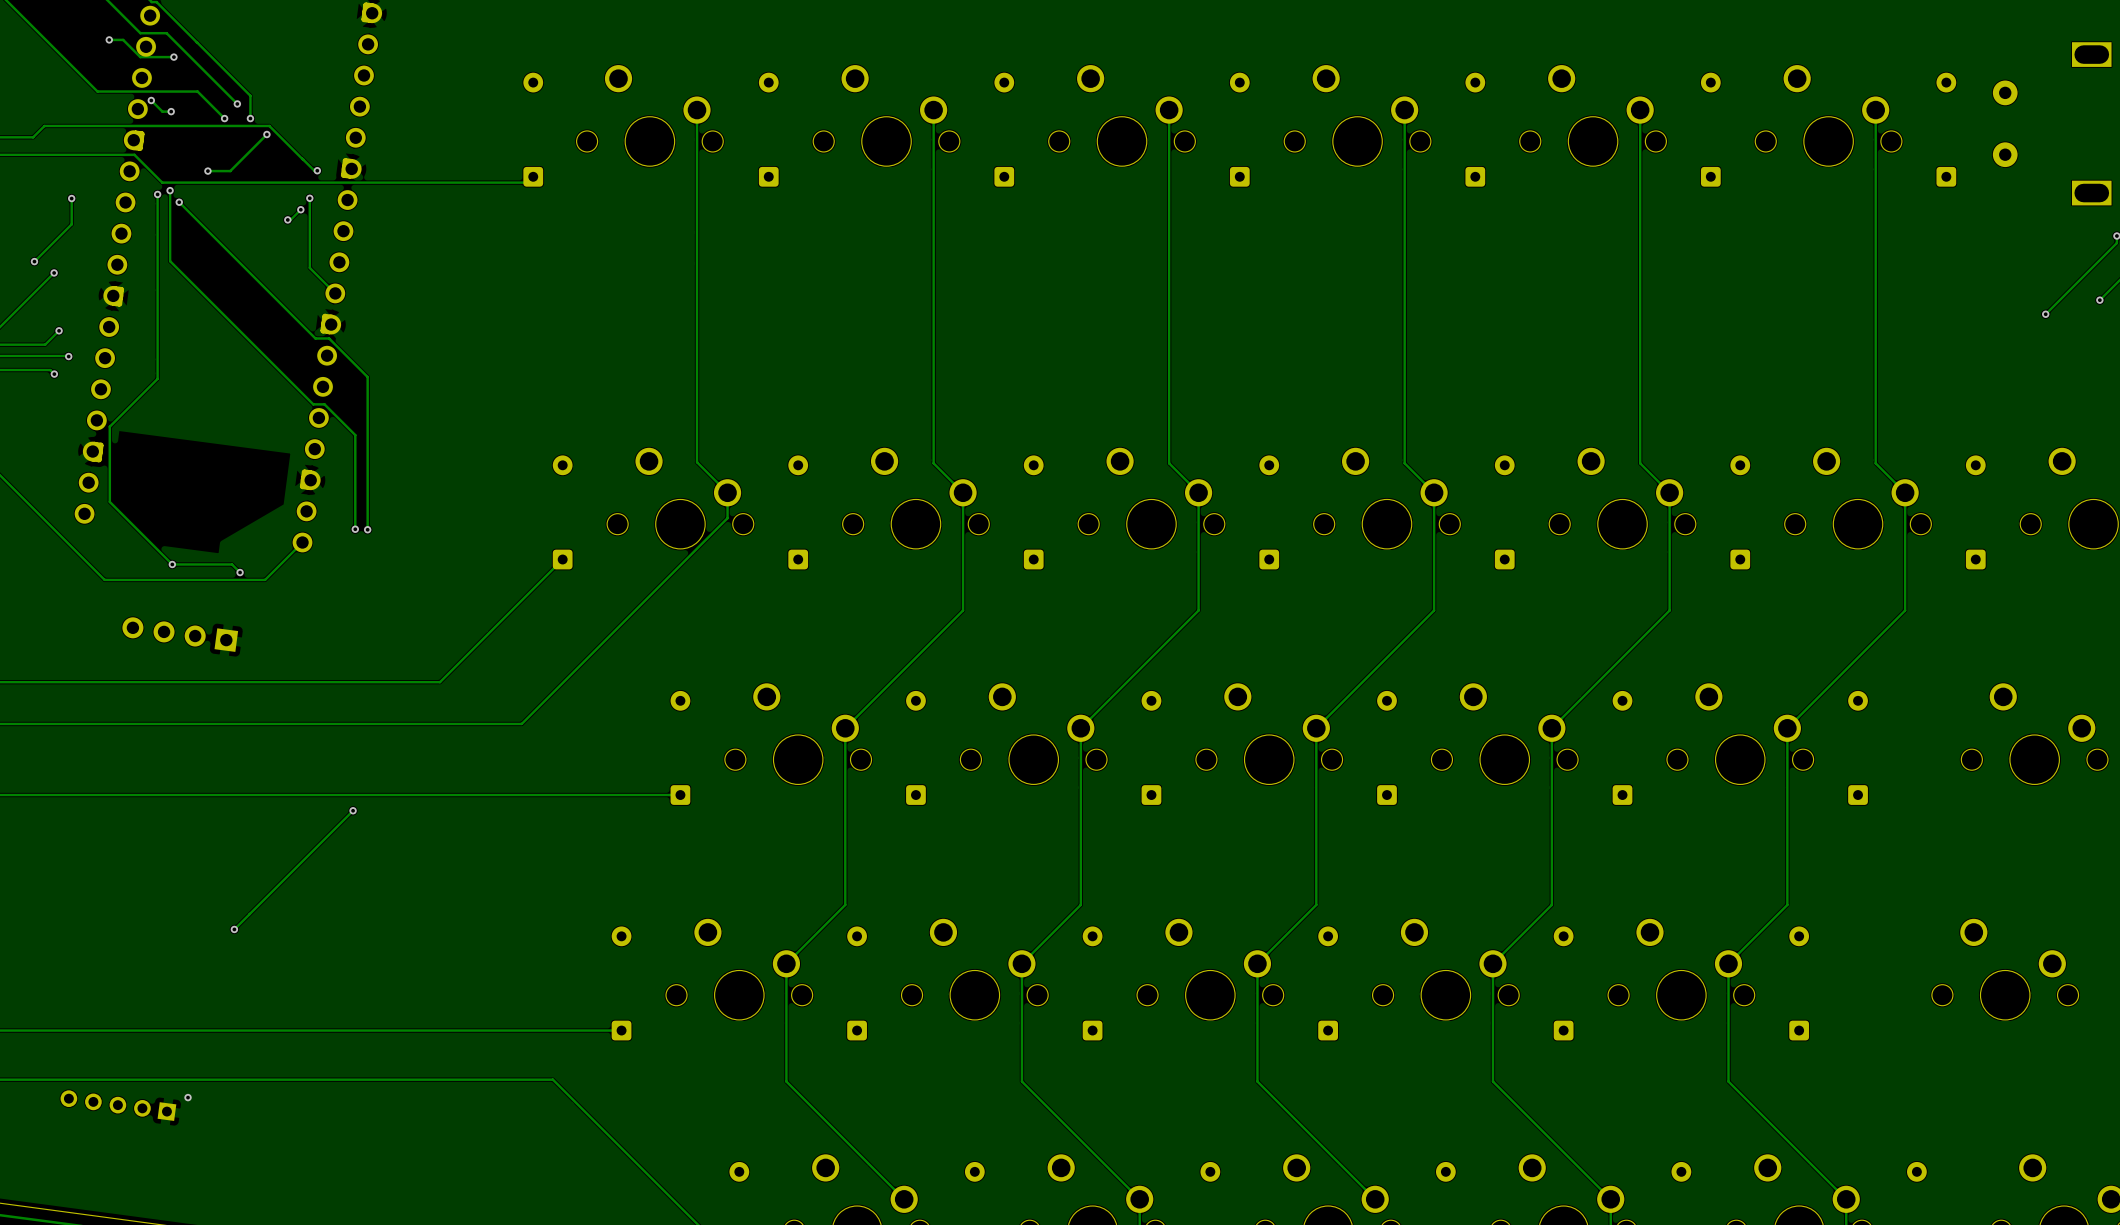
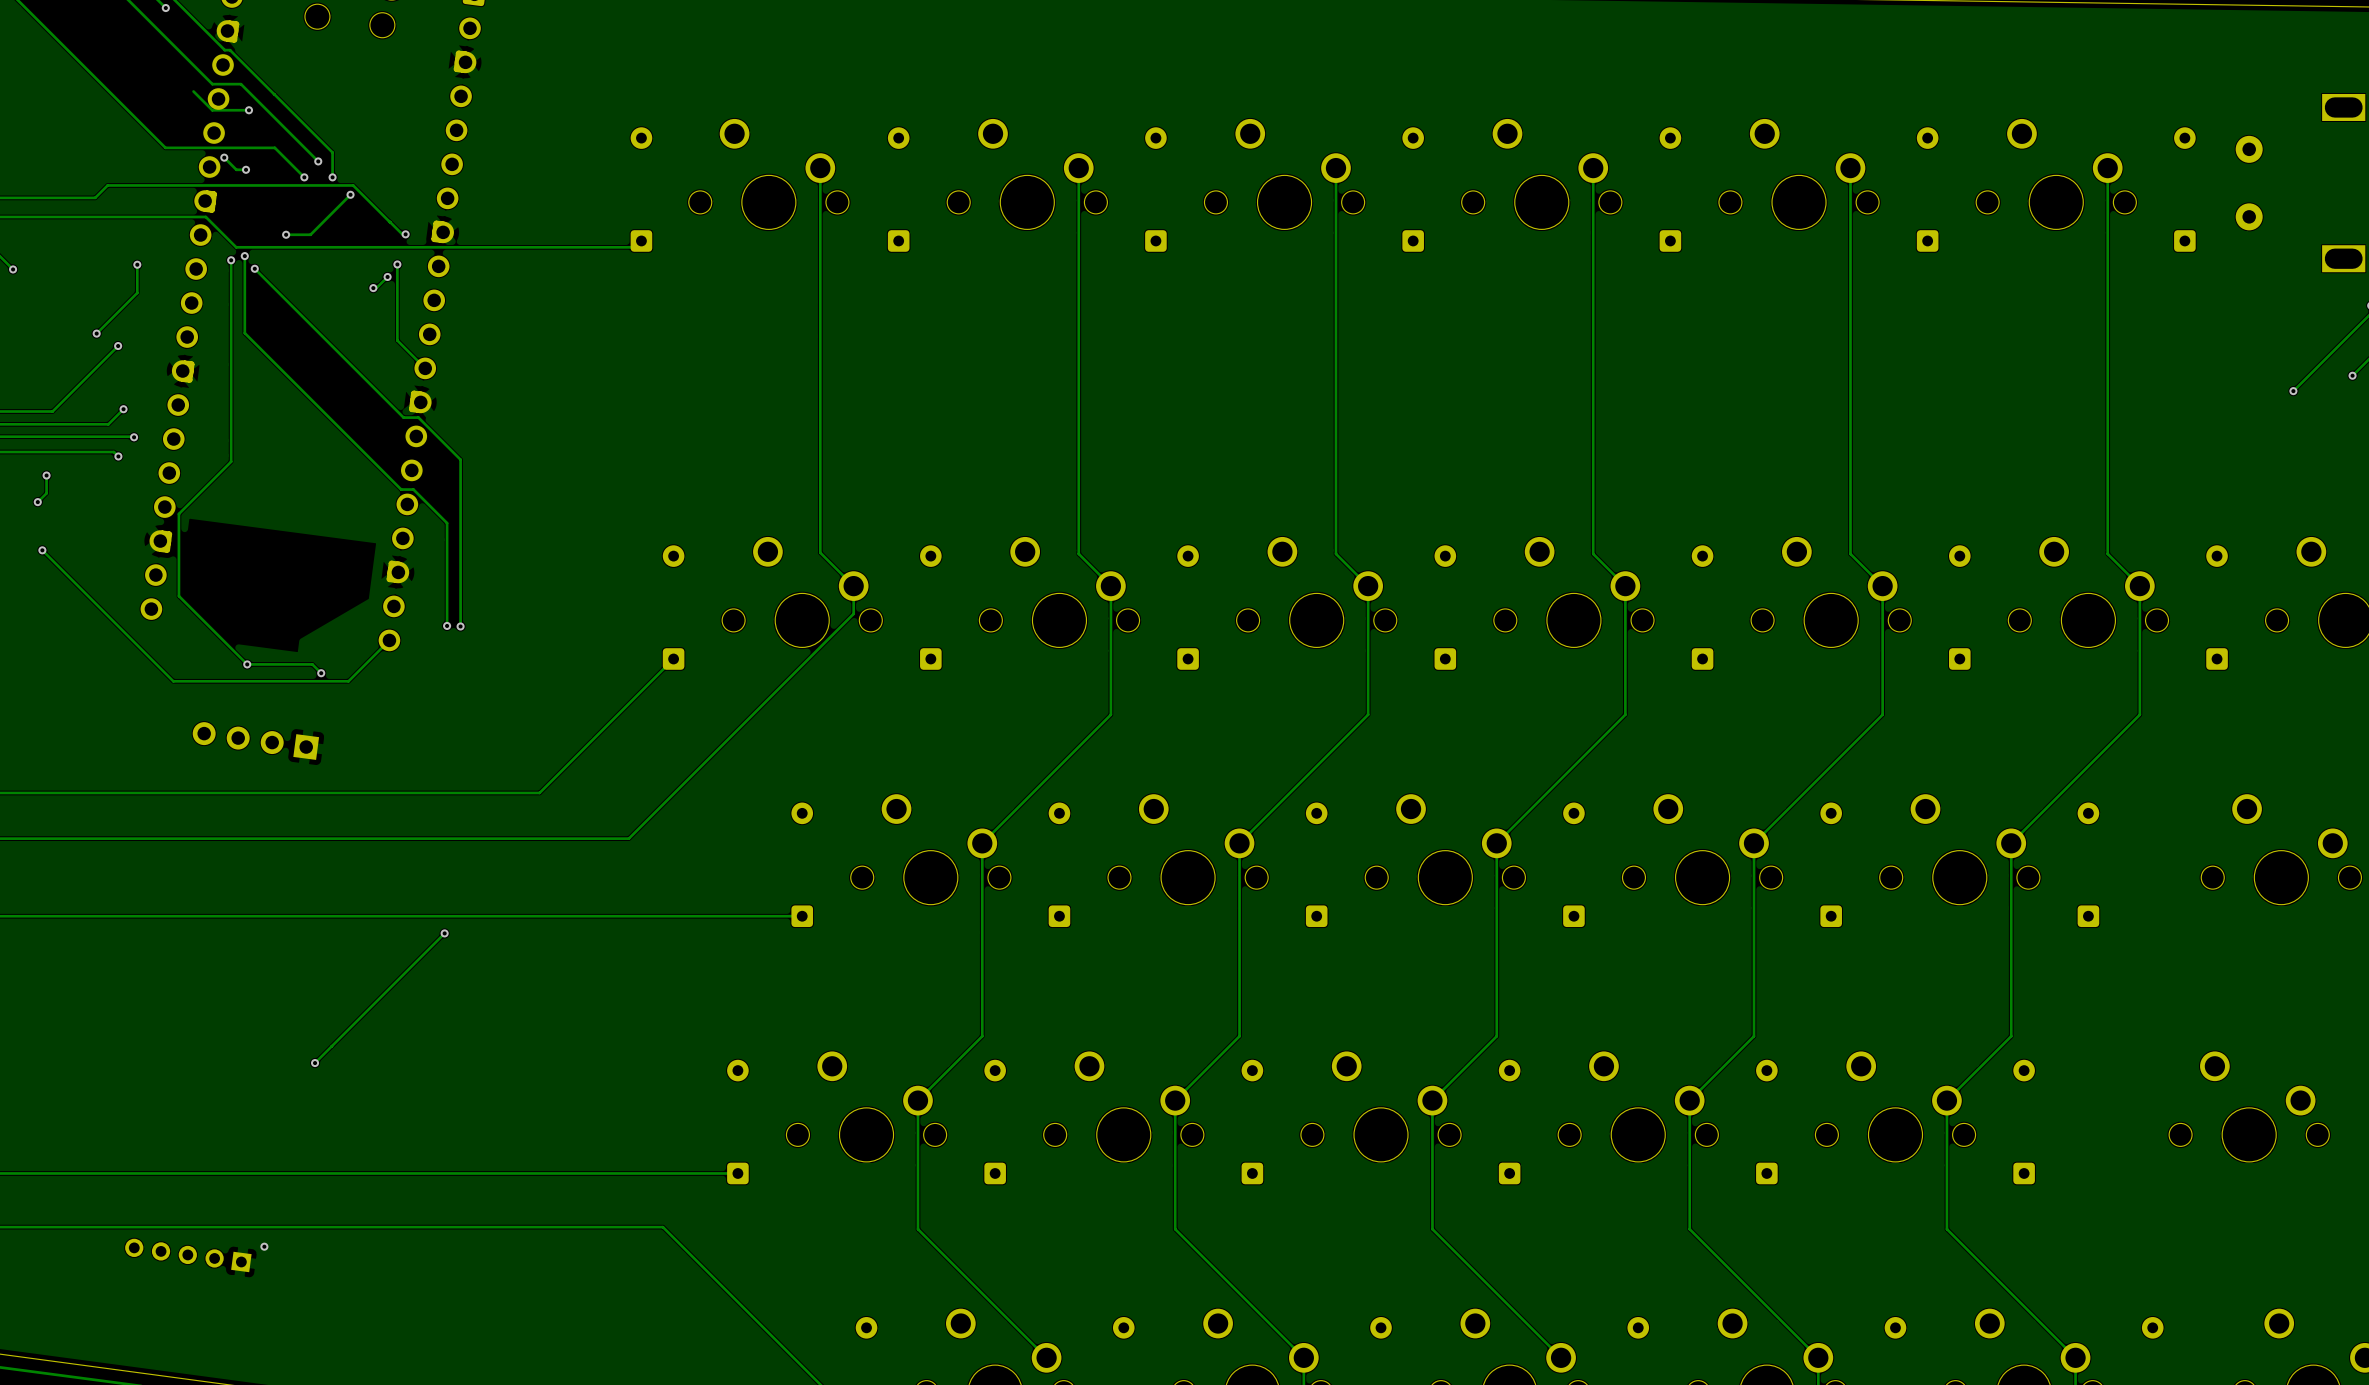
via: (109, 39) -> none
track: (123, 39) (109, 39) -> none

